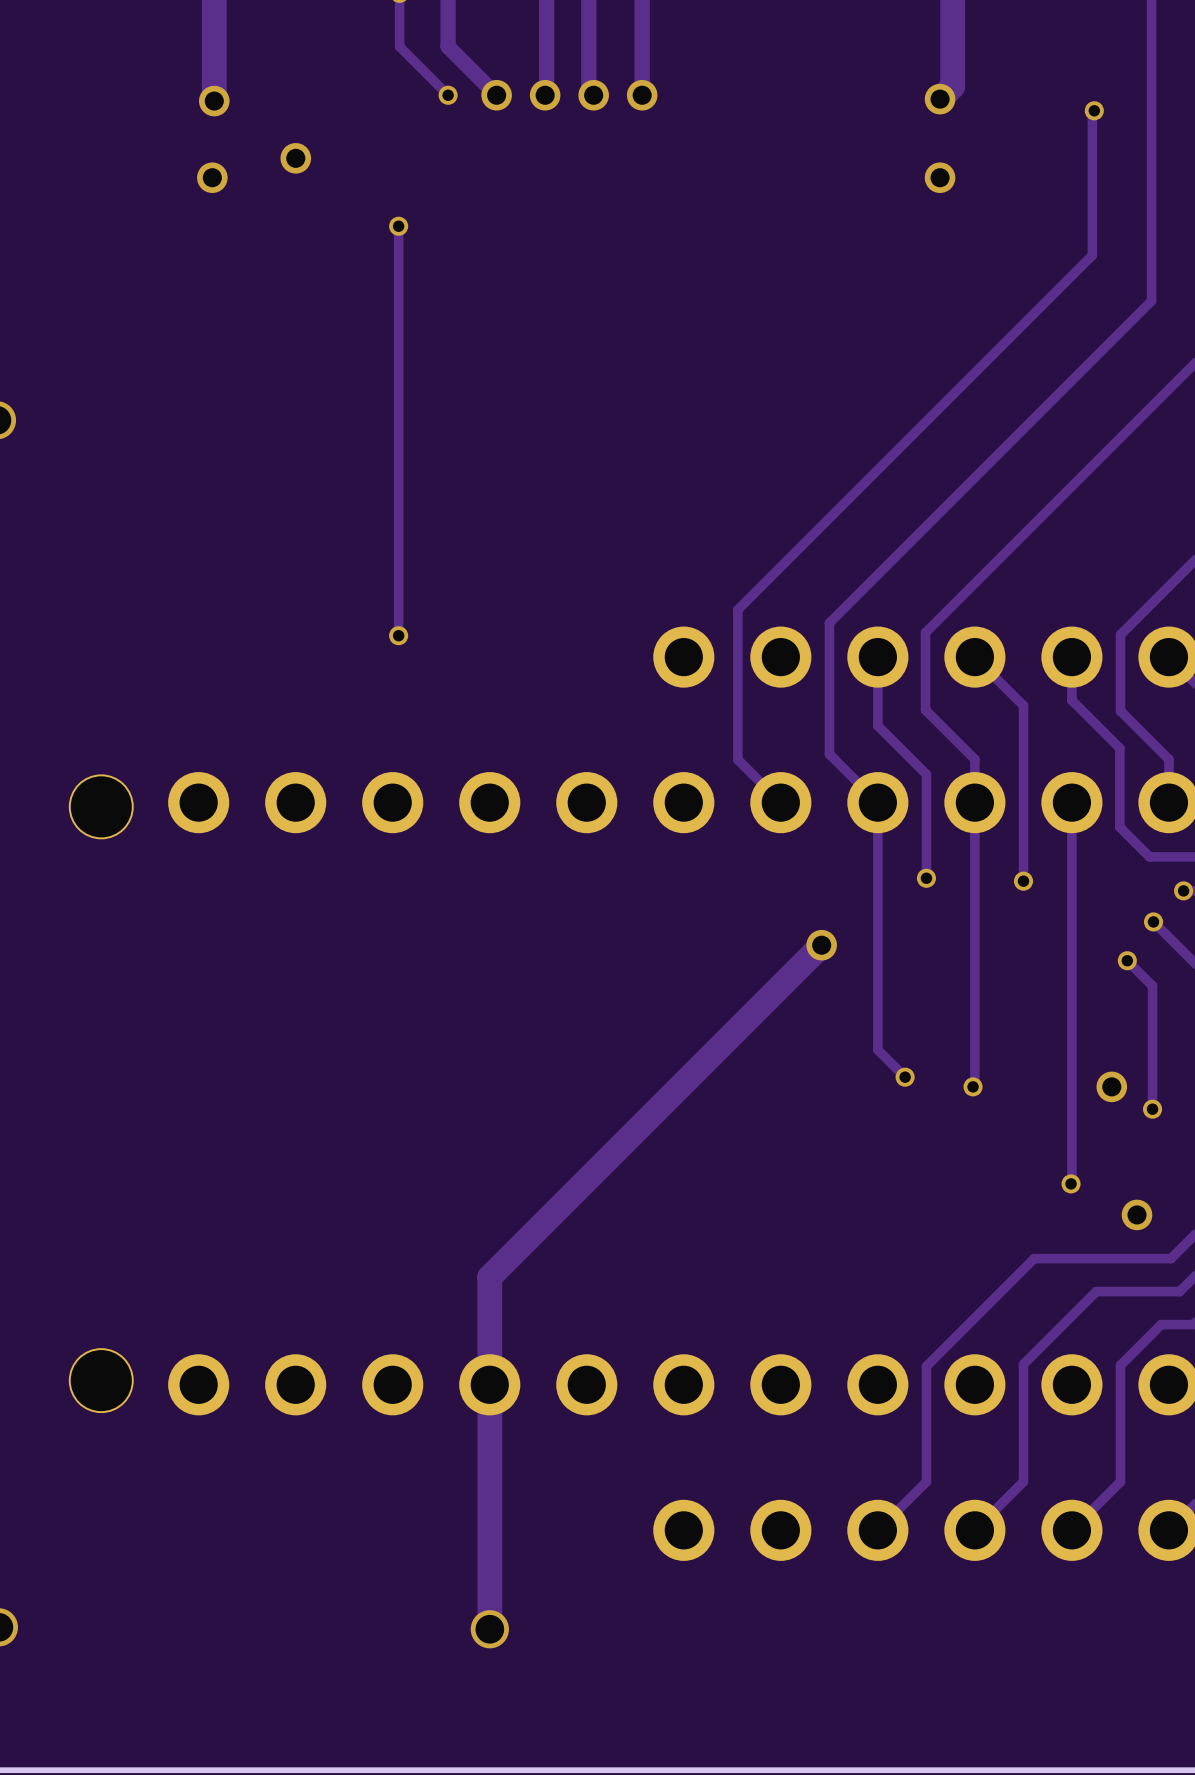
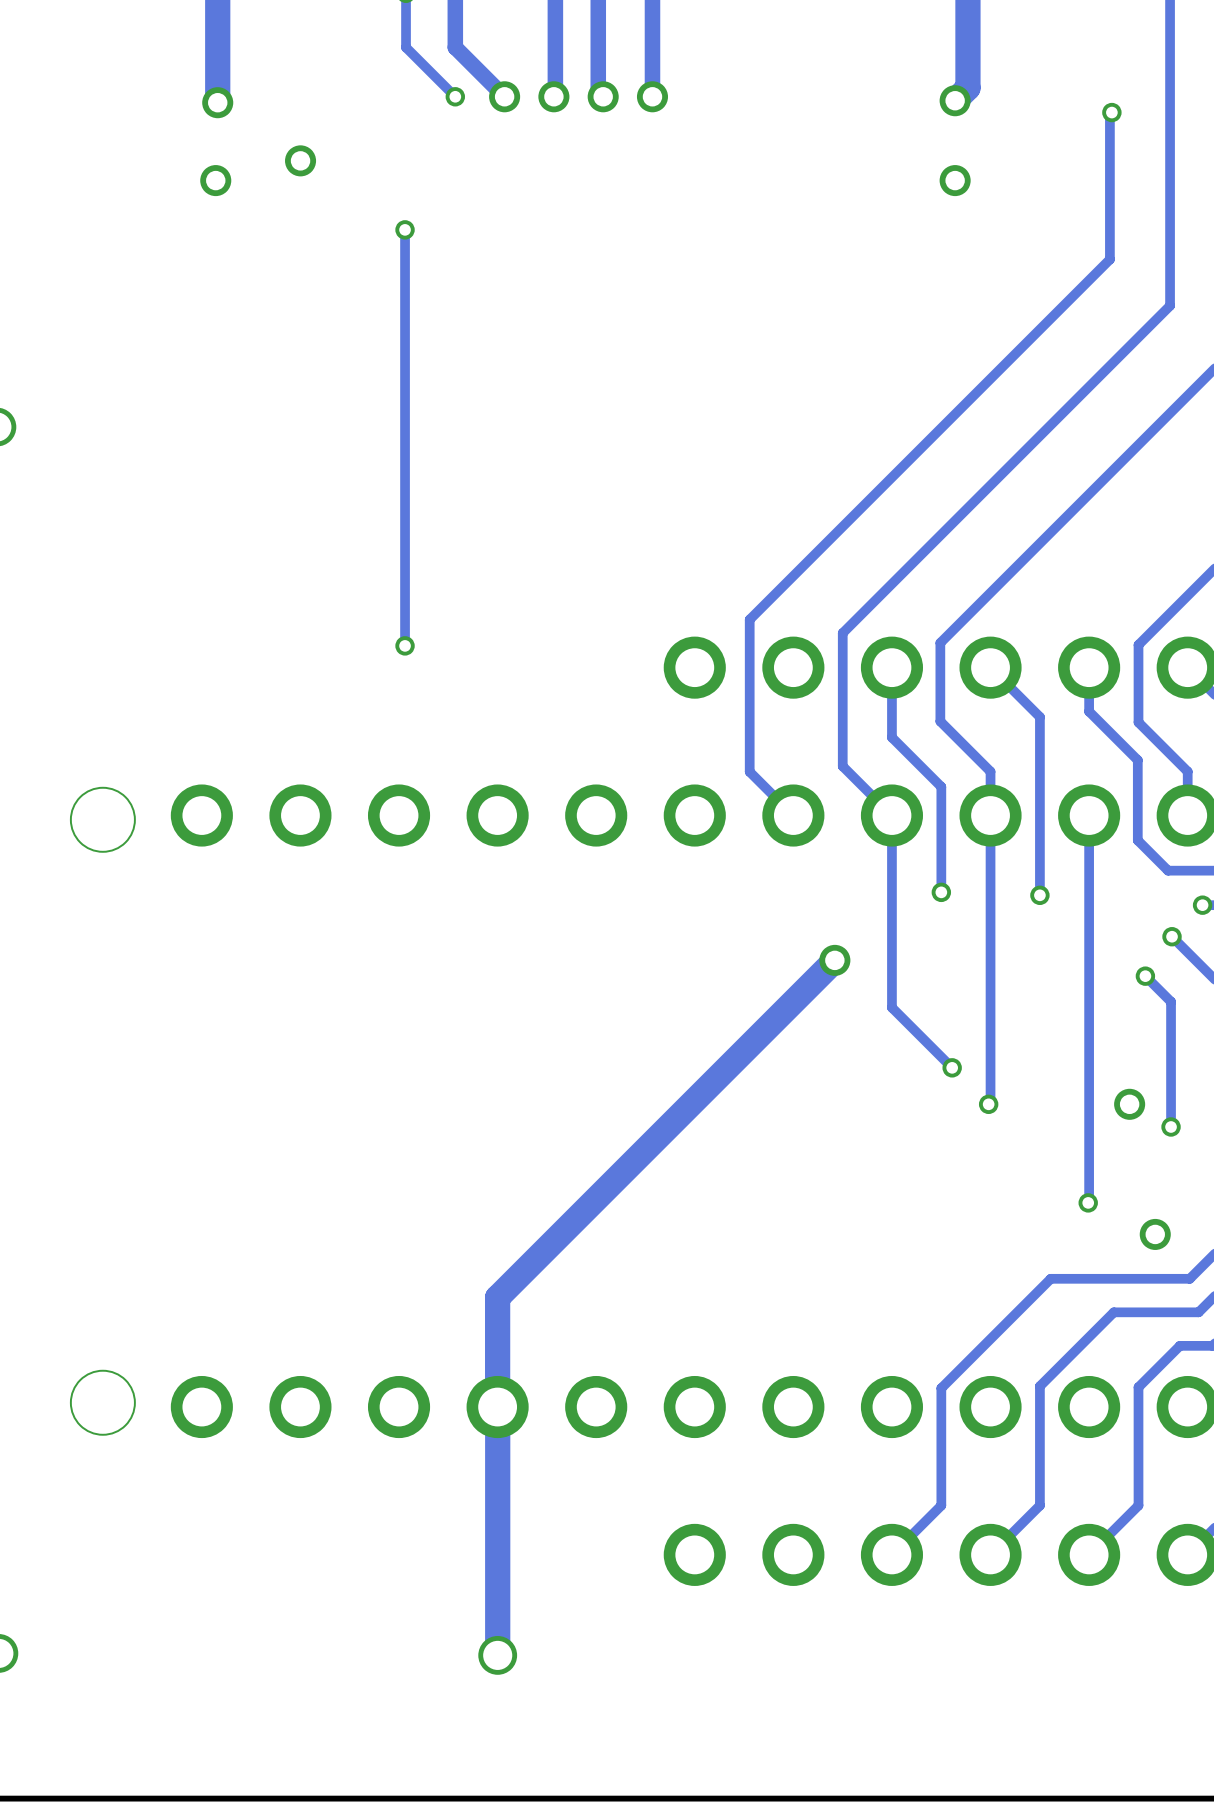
track: (877, 991) (877, 1049) (905, 1077) -> (891, 1007) (952, 1067)
via position: (905, 1077) -> (952, 1067)

